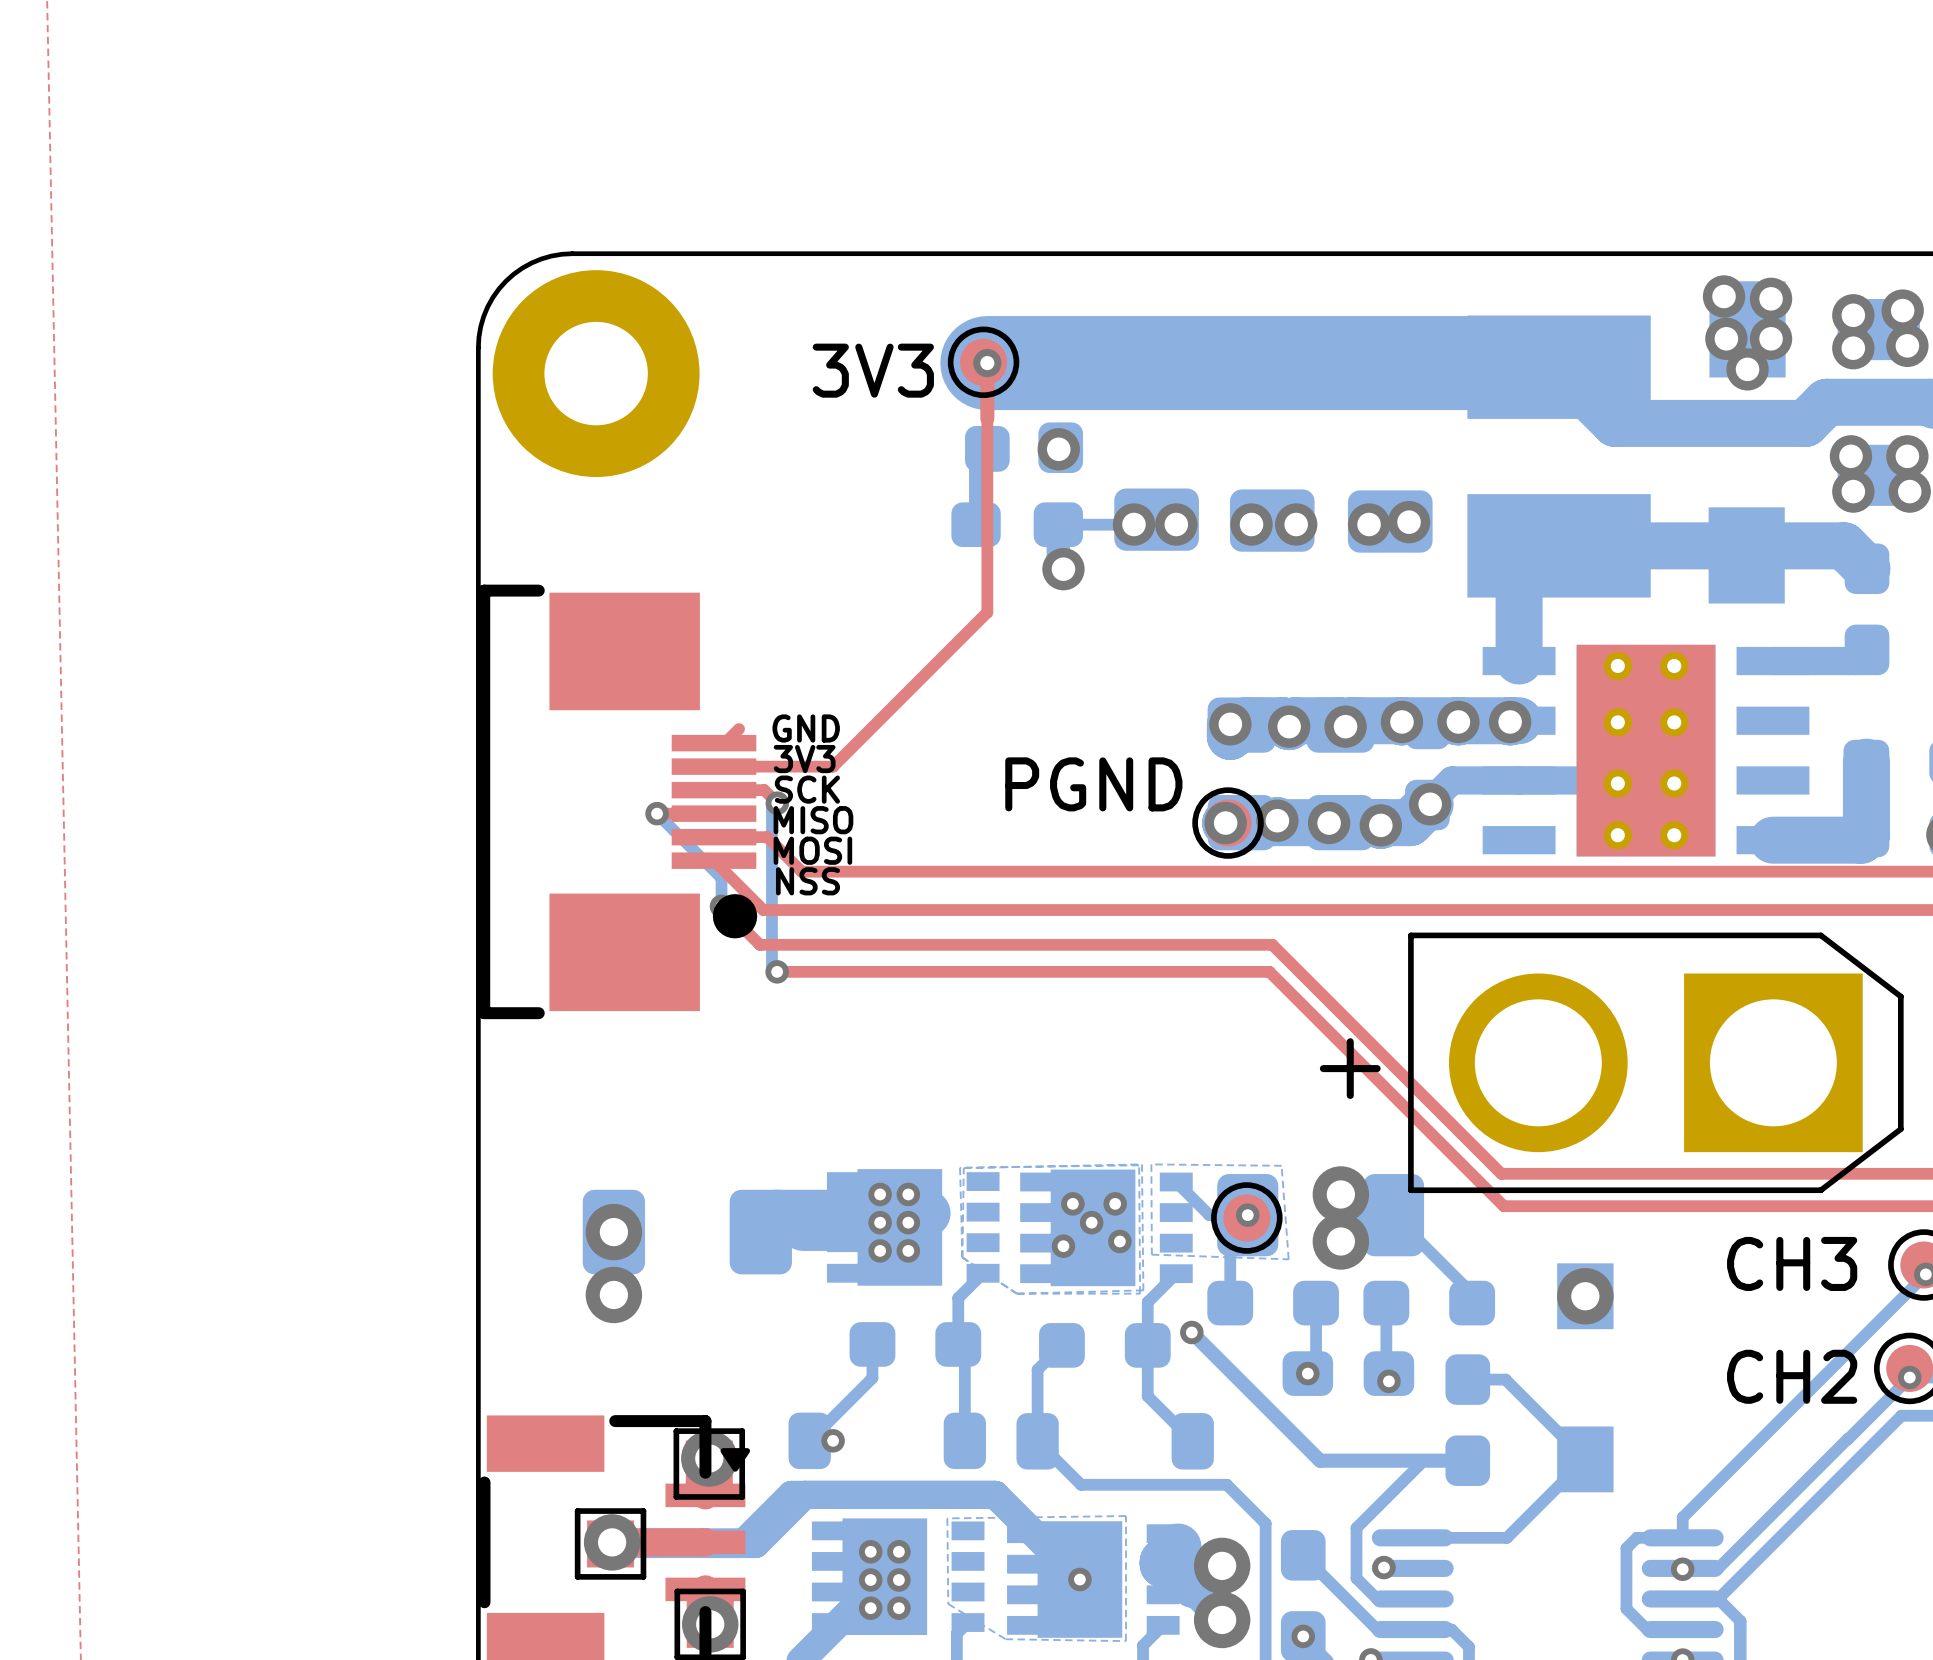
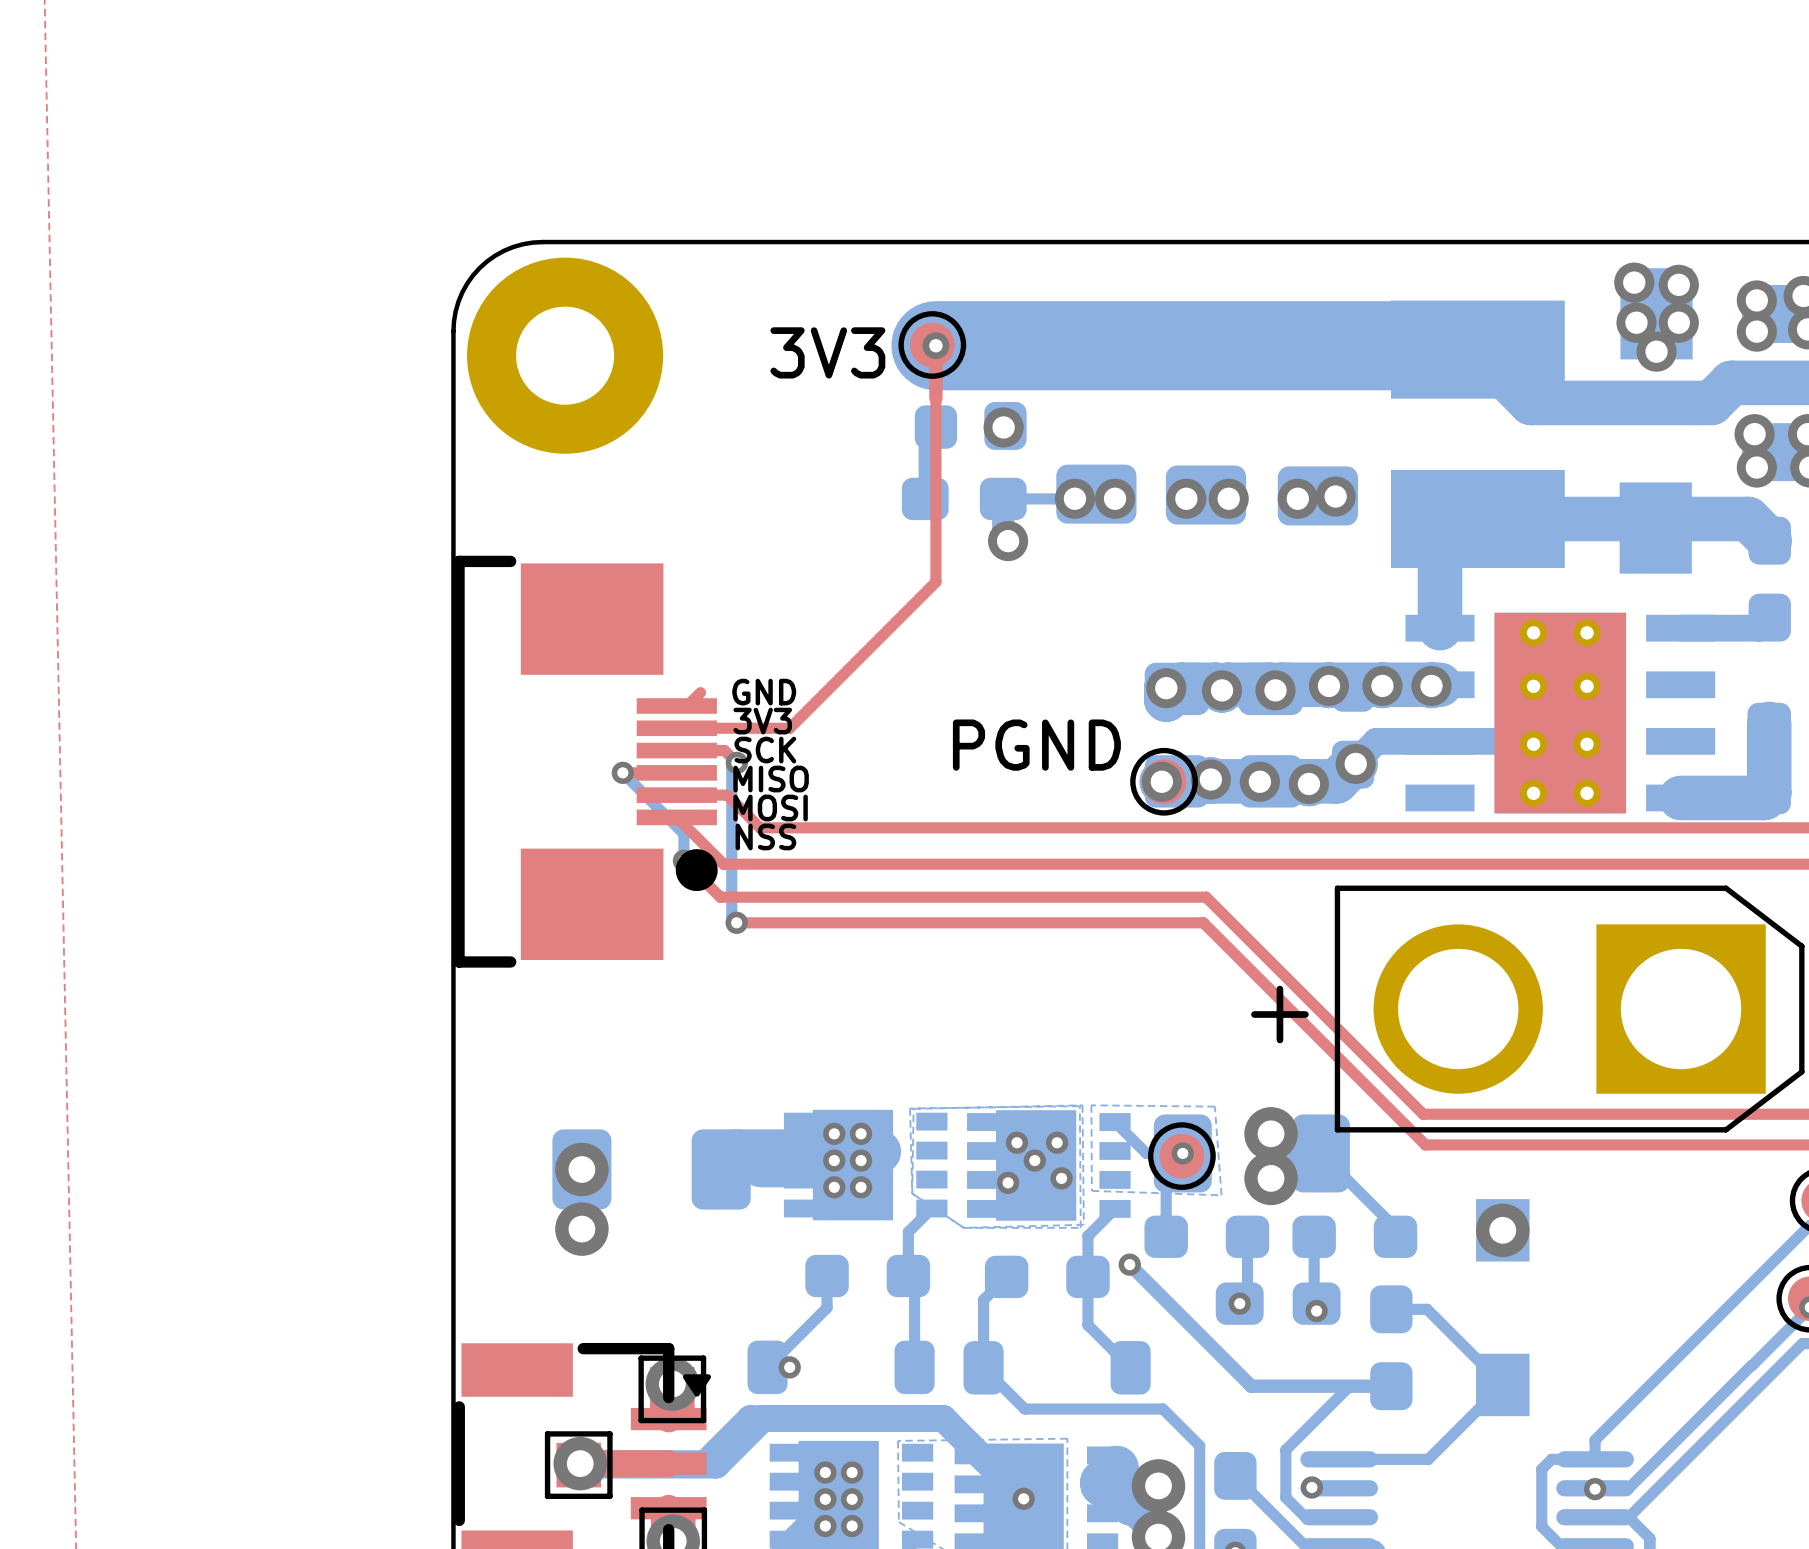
text: CH3 (1792, 1263) -> none
text: CH2 (1792, 1376) -> none

